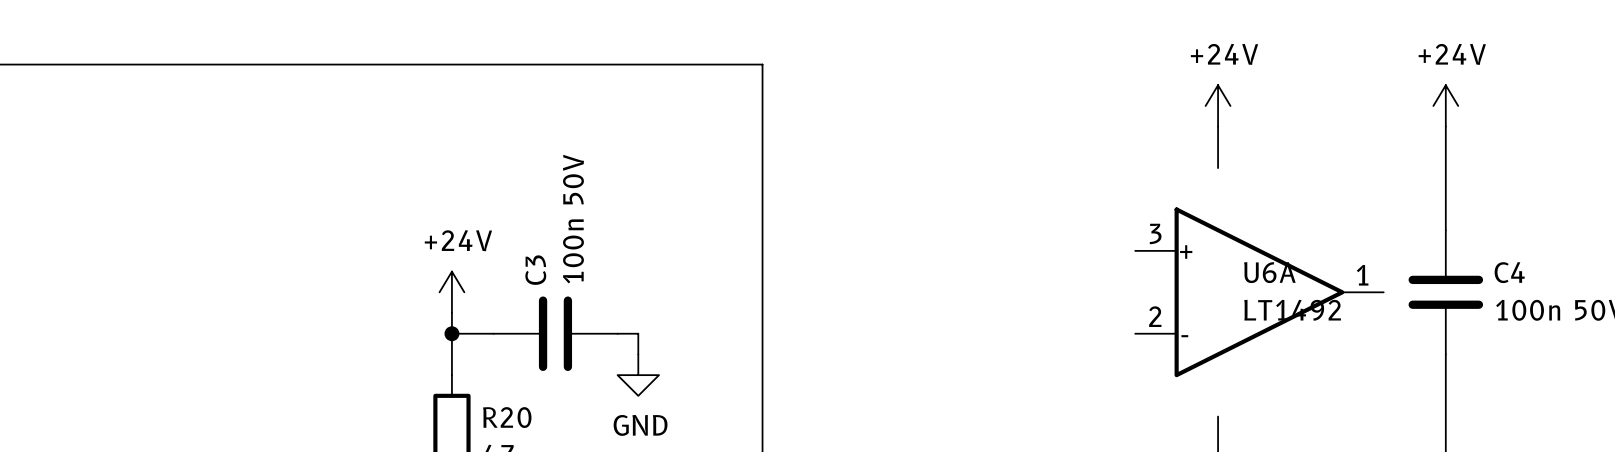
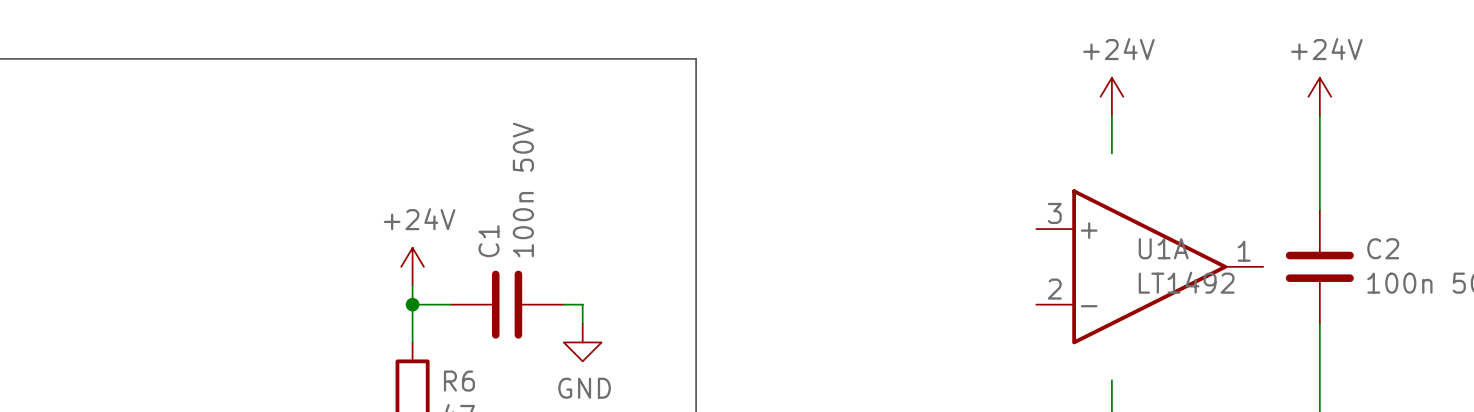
C3 name: C3 (535, 270) -> C1 (488, 241)
U6A name: U6A (1269, 272) -> U1A (1163, 248)
C4 name: C4 (1509, 272) -> C2 (1383, 248)
R20 name: R20 (507, 417) -> R6 (459, 381)

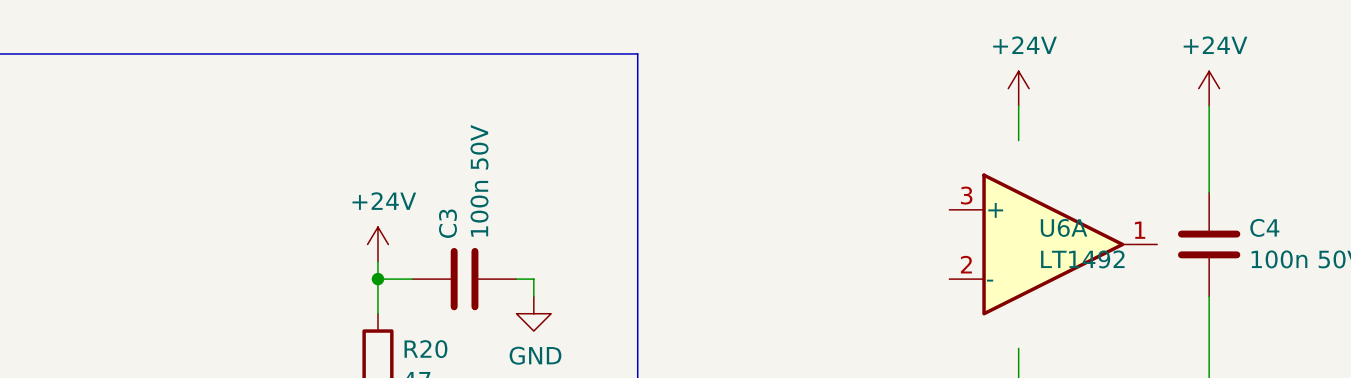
C1 name: C1 (488, 241) -> C3 (447, 223)
U1A name: U1A (1163, 248) -> U6A (1064, 227)
C2 name: C2 (1383, 248) -> C4 (1264, 227)
R6 name: R6 (459, 381) -> R20 (425, 349)

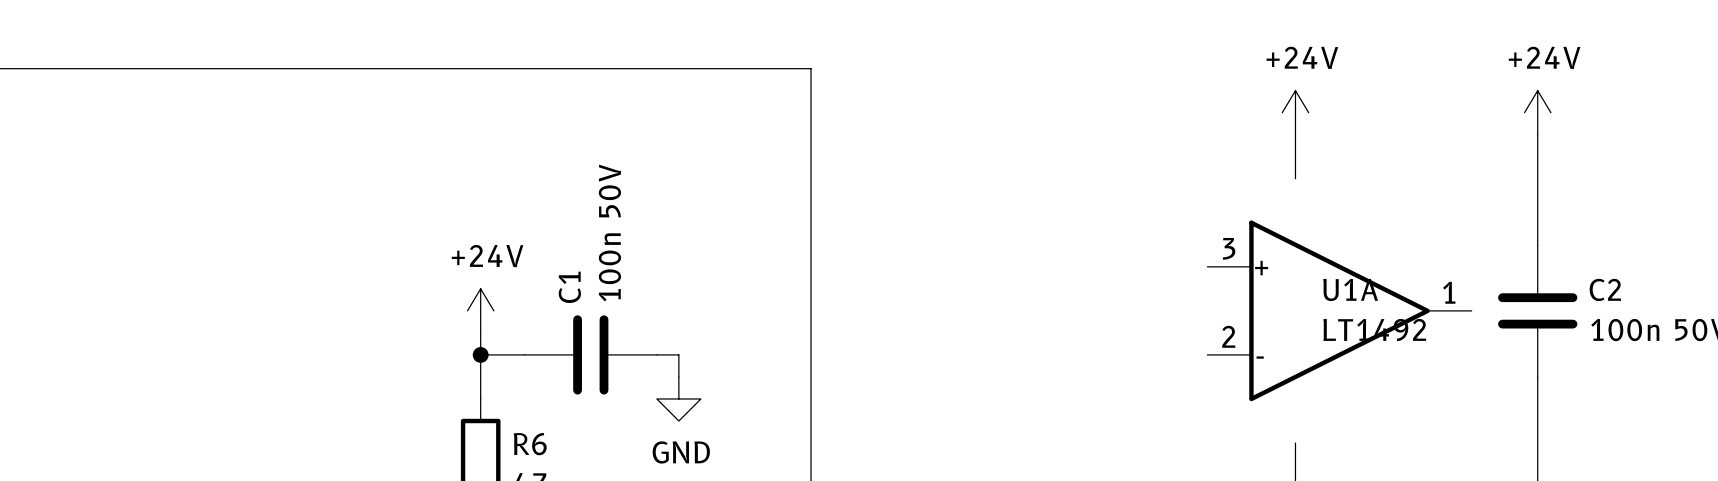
C3 name: C3 (447, 223) -> C1 (569, 287)
U6A name: U6A (1064, 227) -> U1A (1350, 289)
C4 name: C4 (1264, 227) -> C2 (1605, 289)
R20 name: R20 (425, 349) -> R6 (530, 444)

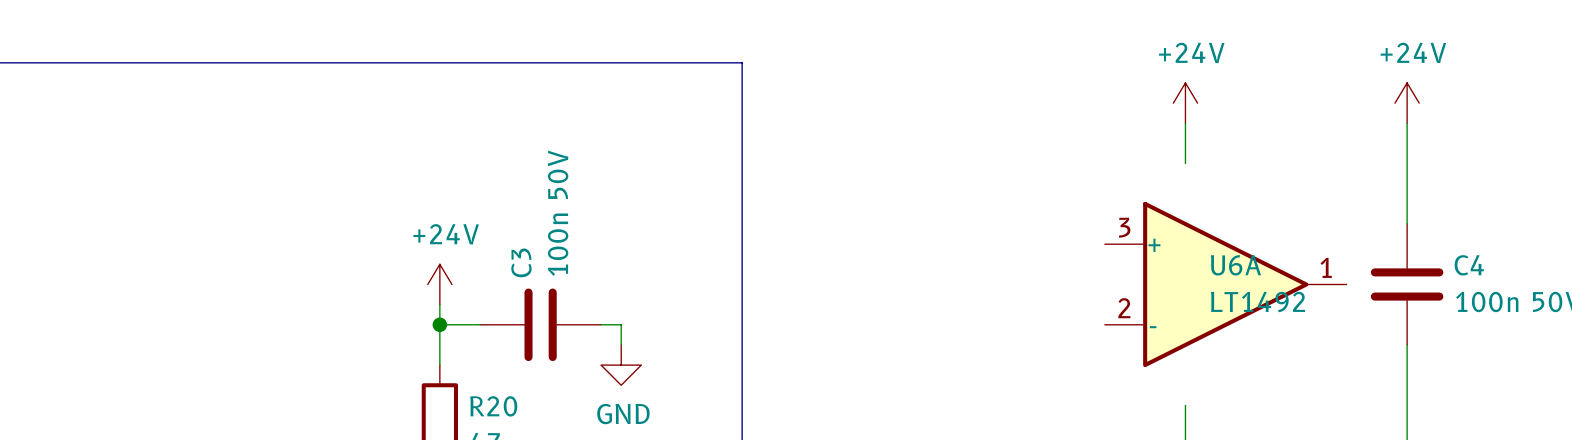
C1 name: C1 (569, 287) -> C3 (521, 262)
U1A name: U1A (1350, 289) -> U6A (1235, 265)
C2 name: C2 (1605, 289) -> C4 (1469, 265)
R6 name: R6 (530, 444) -> R20 (493, 406)

